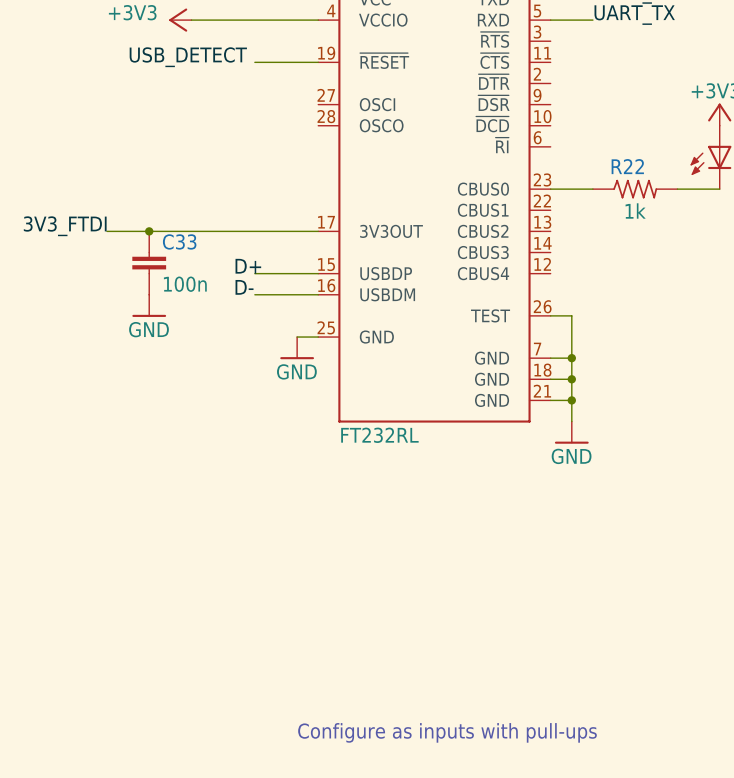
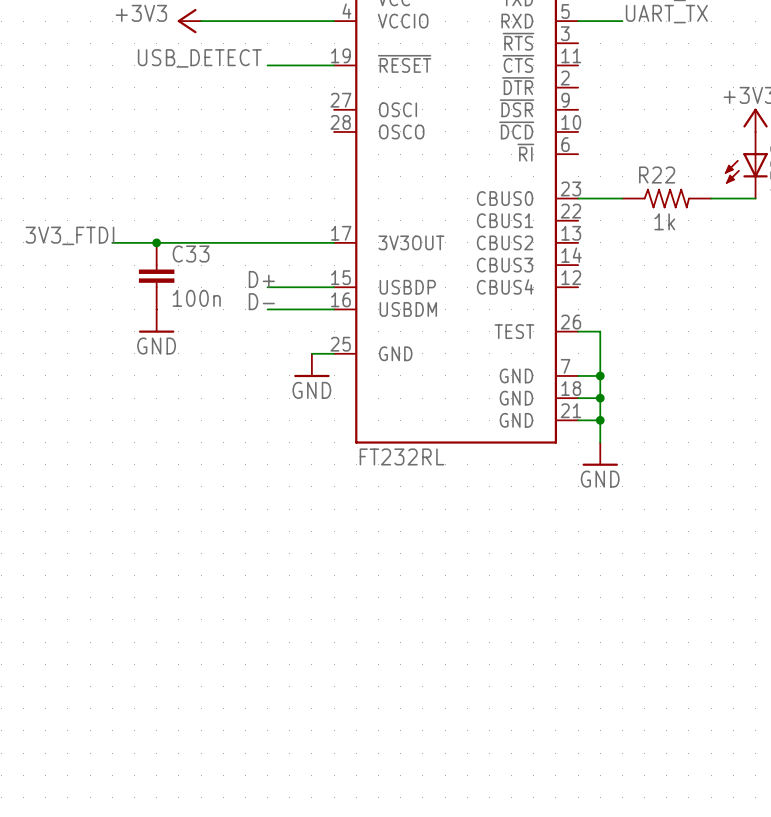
text: Configure as inputs with pull-ups (447, 732) -> none

